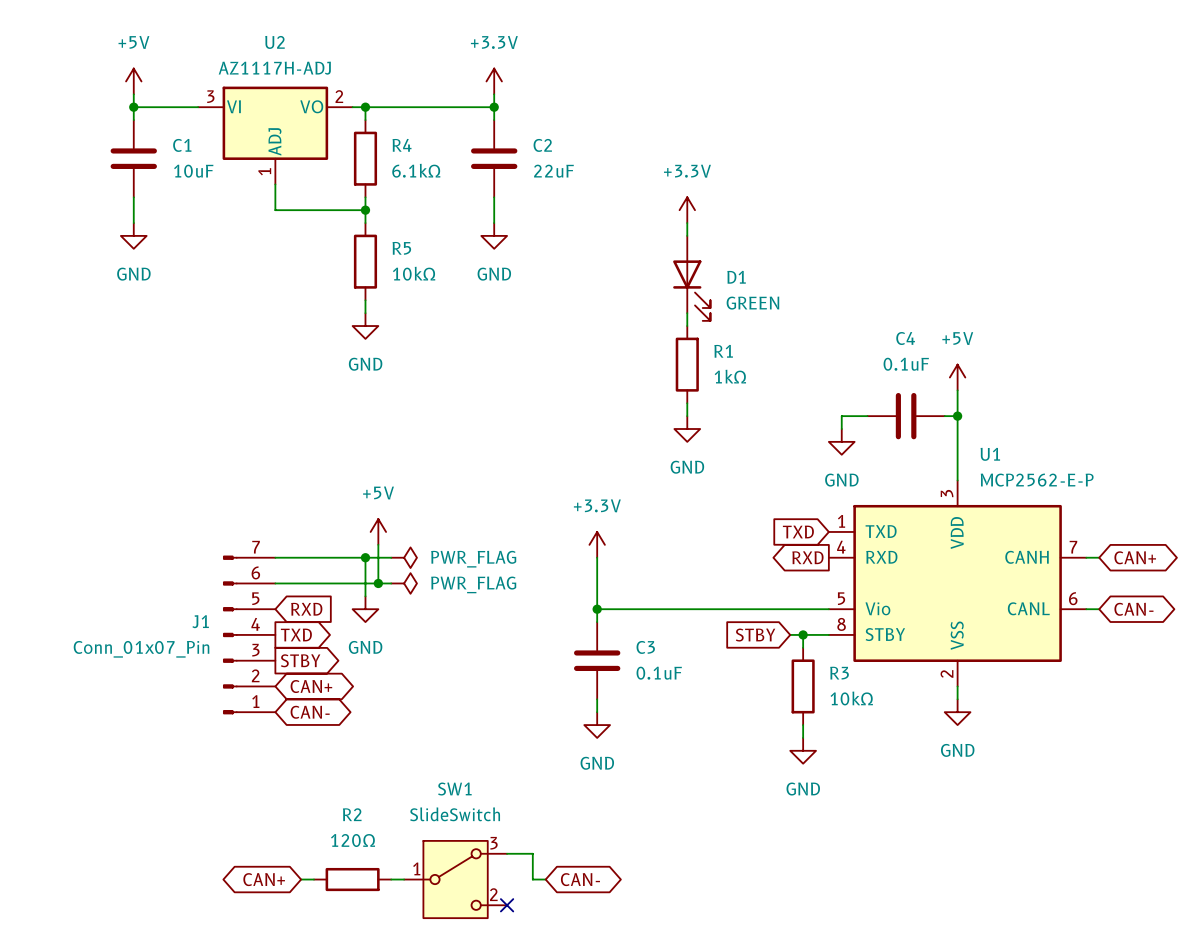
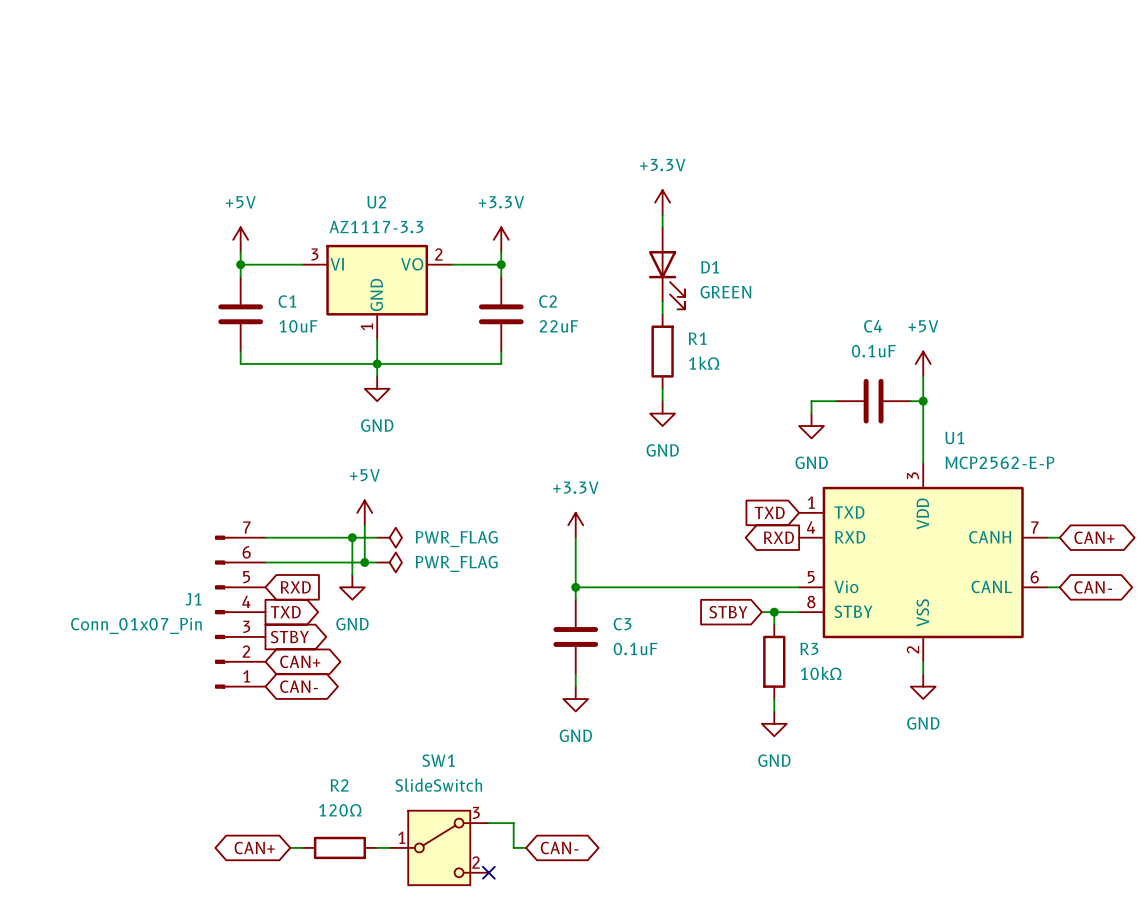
U2 value: AZ1117H-ADJ (274, 68) -> AZ1117-3.3 (376, 227)
power symbol position: +5V (133, 81) -> +5V (240, 239)
power symbol position: +3.3V (494, 81) -> +3.3V (501, 239)
wire: (133, 94) (133, 120) -> (240, 252) (240, 277)
wire: (494, 94) (494, 120) -> none
wire: (133, 107) (198, 107) -> (240, 264) (302, 264)
junction: (133, 107) -> none
wire: (352, 107) (494, 107) -> none
wire: (365, 107) (365, 120) -> none
junction: (365, 107) -> none
junction: (494, 107) -> none
U2 position: (275, 135) -> (377, 291)
U2 pin name: ADJ (274, 141) -> GND (376, 294)
C1 position: (133, 158) -> (240, 314)
R4: 6.1kΩ (365, 158) -> none
C2 position: (494, 158) -> (501, 314)
wire: (275, 184) (275, 210) (365, 210) -> none
wire: (133, 197) (133, 223) -> none
wire: (365, 197) (365, 223) -> none
wire: (494, 197) (494, 223) -> (501, 252) (501, 277)
junction: (365, 210) -> none
power symbol: GND (133, 235) -> none
power symbol: GND (494, 235) -> none
R5: 10kΩ (365, 261) -> none
junction: none -> (240, 264)
wire: none -> (451, 264) (501, 264)
junction: none -> (501, 264)
power symbol position: GND (365, 326) -> GND (377, 388)
wire: none -> (377, 339) (377, 376)
wire: none -> (240, 351) (240, 363) (501, 363) (501, 351)
junction: none -> (377, 363)

